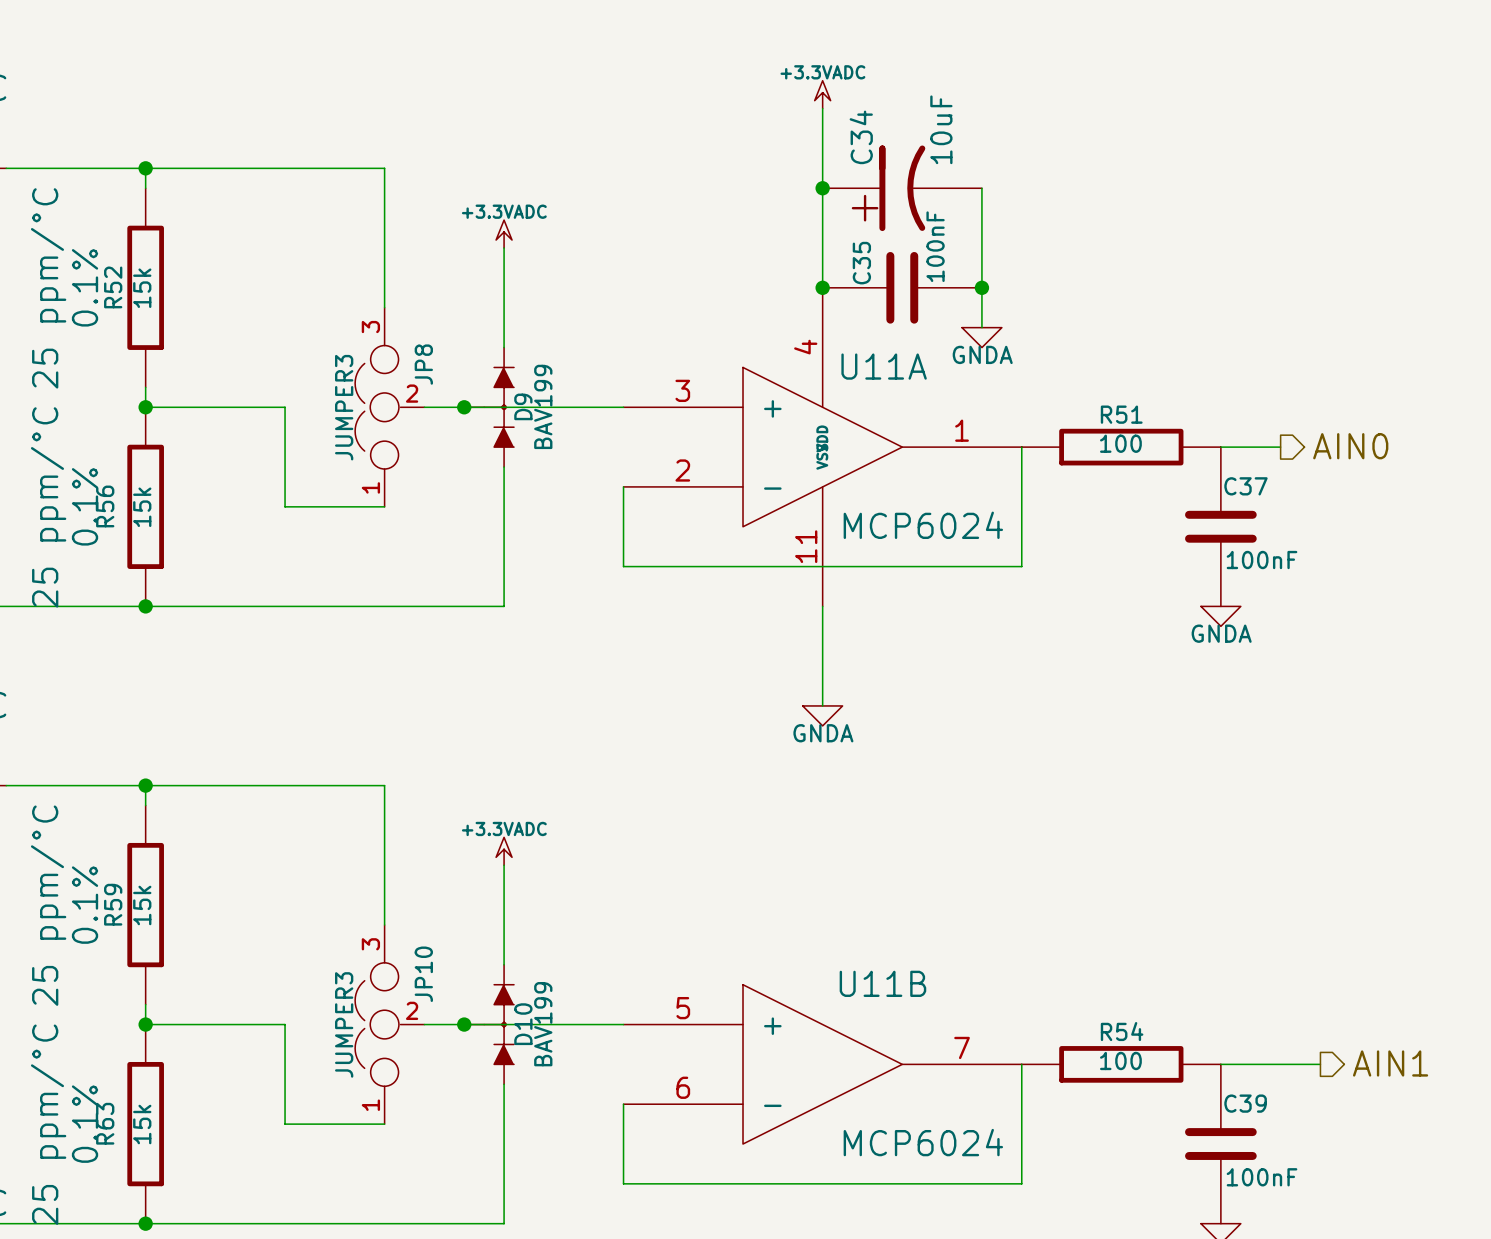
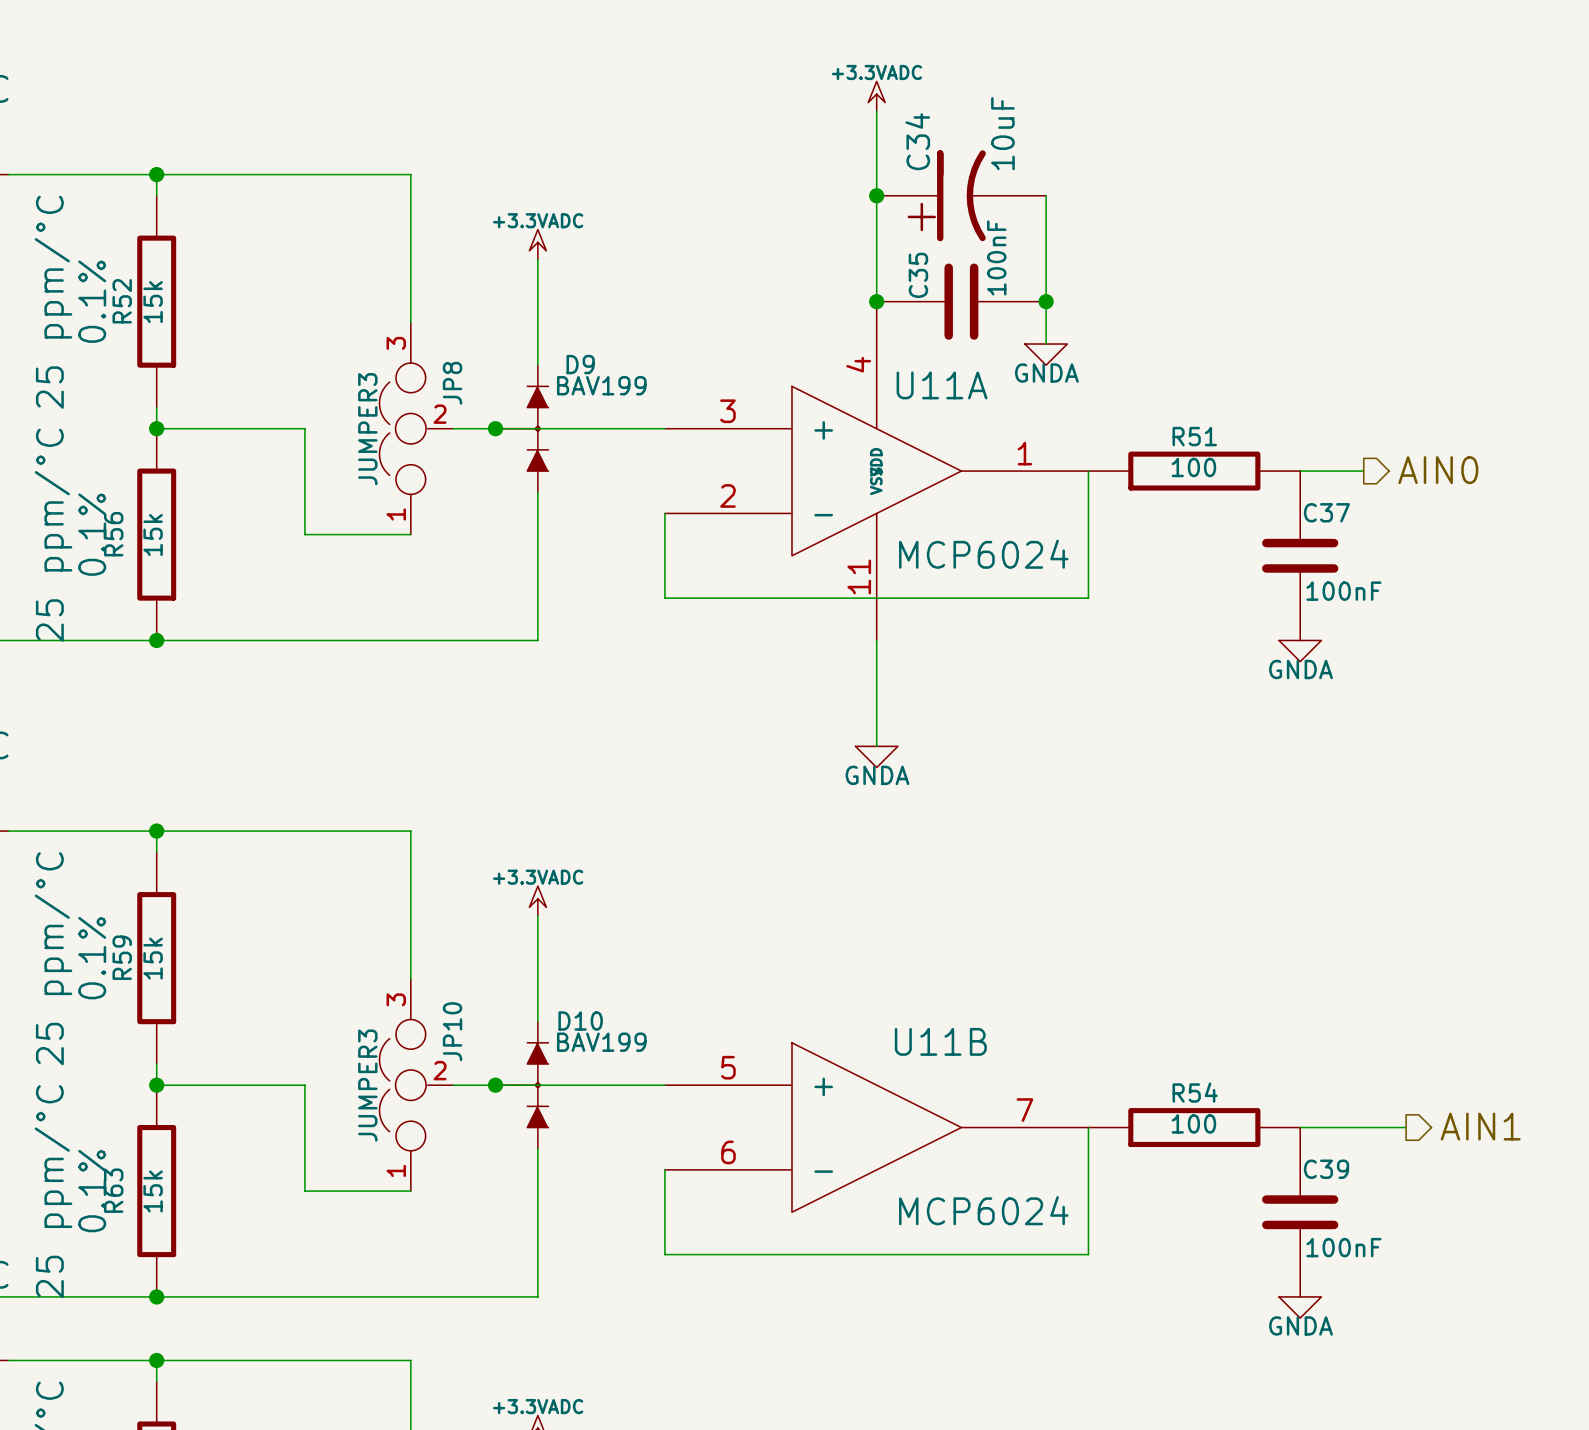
D9 name rotation: 0° (523, 406) -> 90° clockwise (580, 364)
D9 name position: D9 (523, 406) -> D9 (580, 364)
D9 value rotation: 0° (543, 406) -> 90° clockwise (601, 385)
D10 name rotation: 0° (523, 1024) -> 90° clockwise (580, 1021)
D10 name position: D10 (523, 1024) -> D10 (580, 1021)
D10 value rotation: 0° (543, 1024) -> 90° clockwise (601, 1042)

